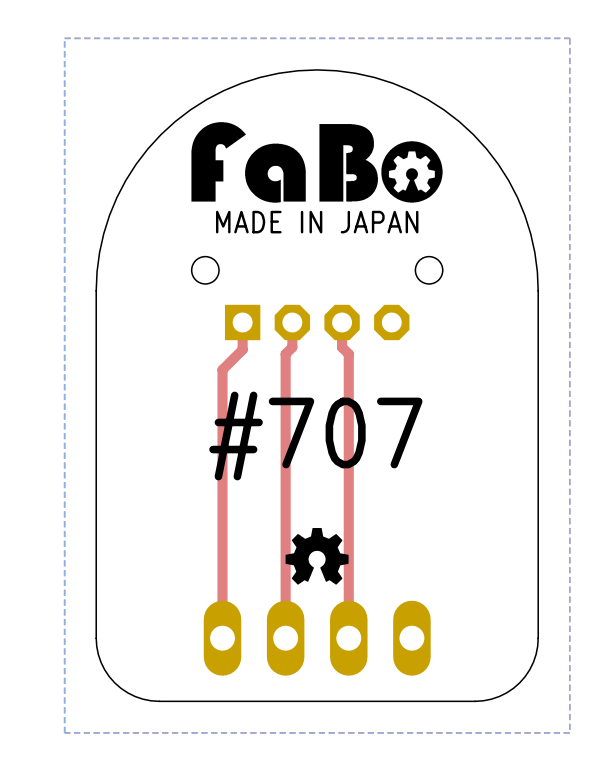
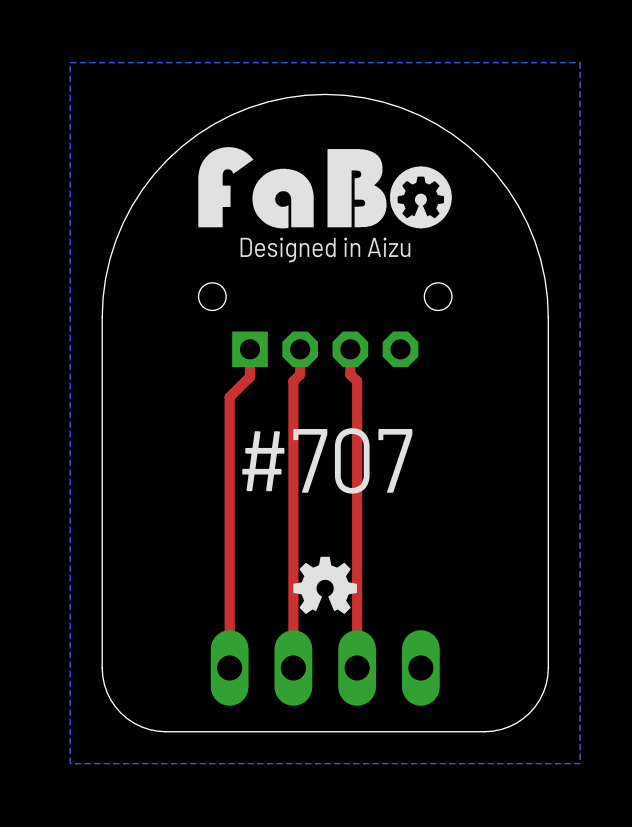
text: MADE IN JAPAN (317, 222) -> Designed in Aizu (325, 249)

